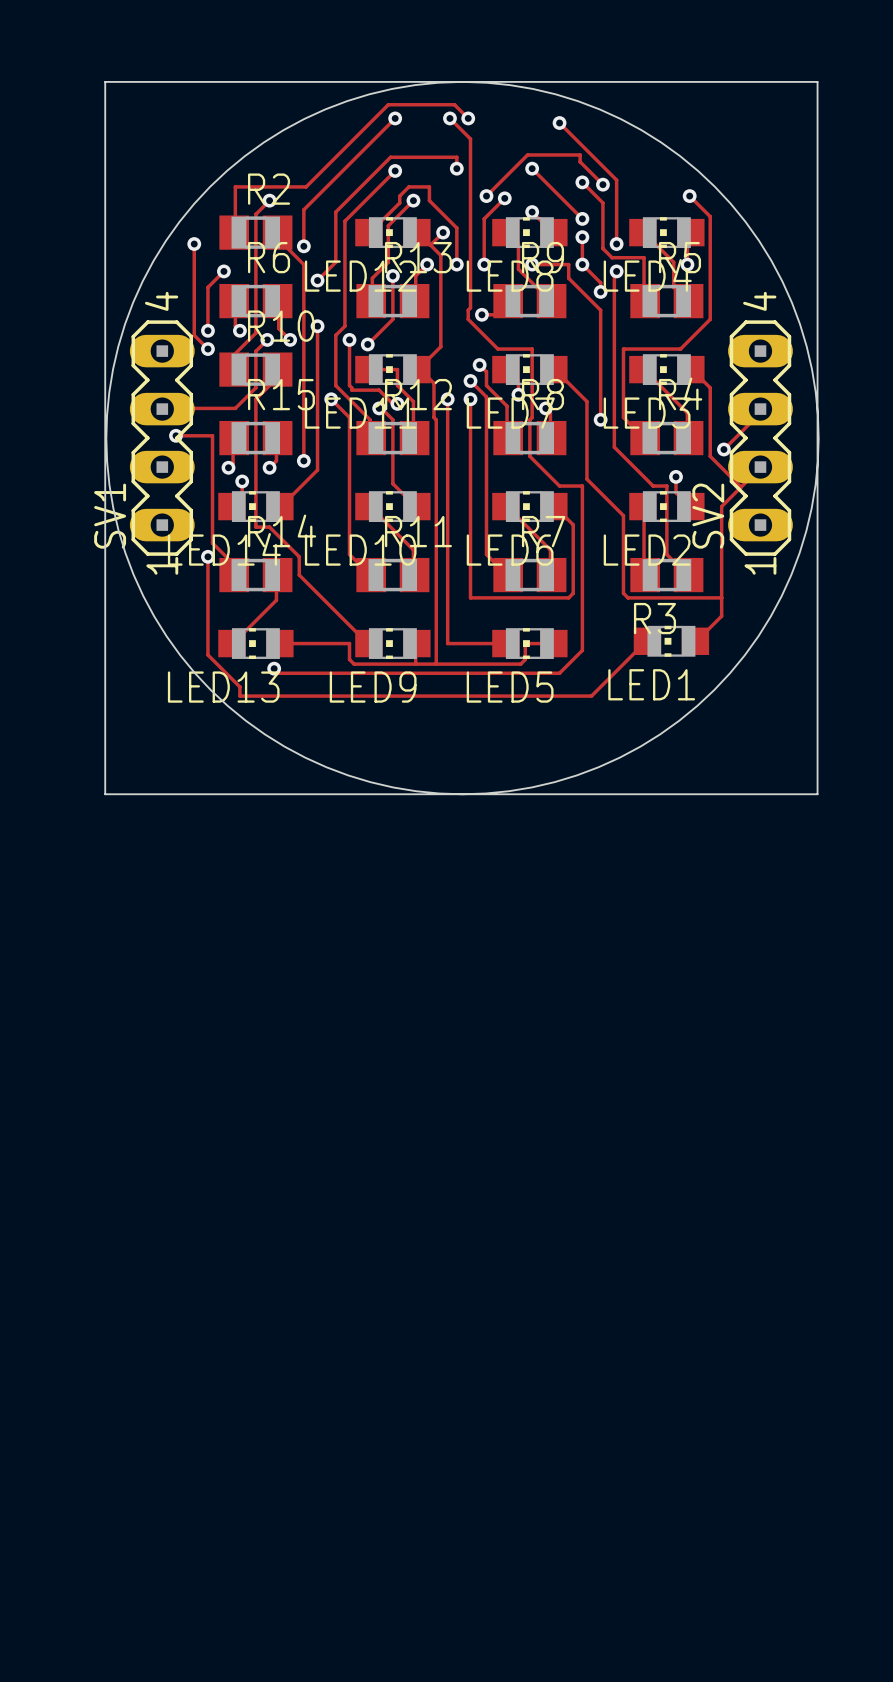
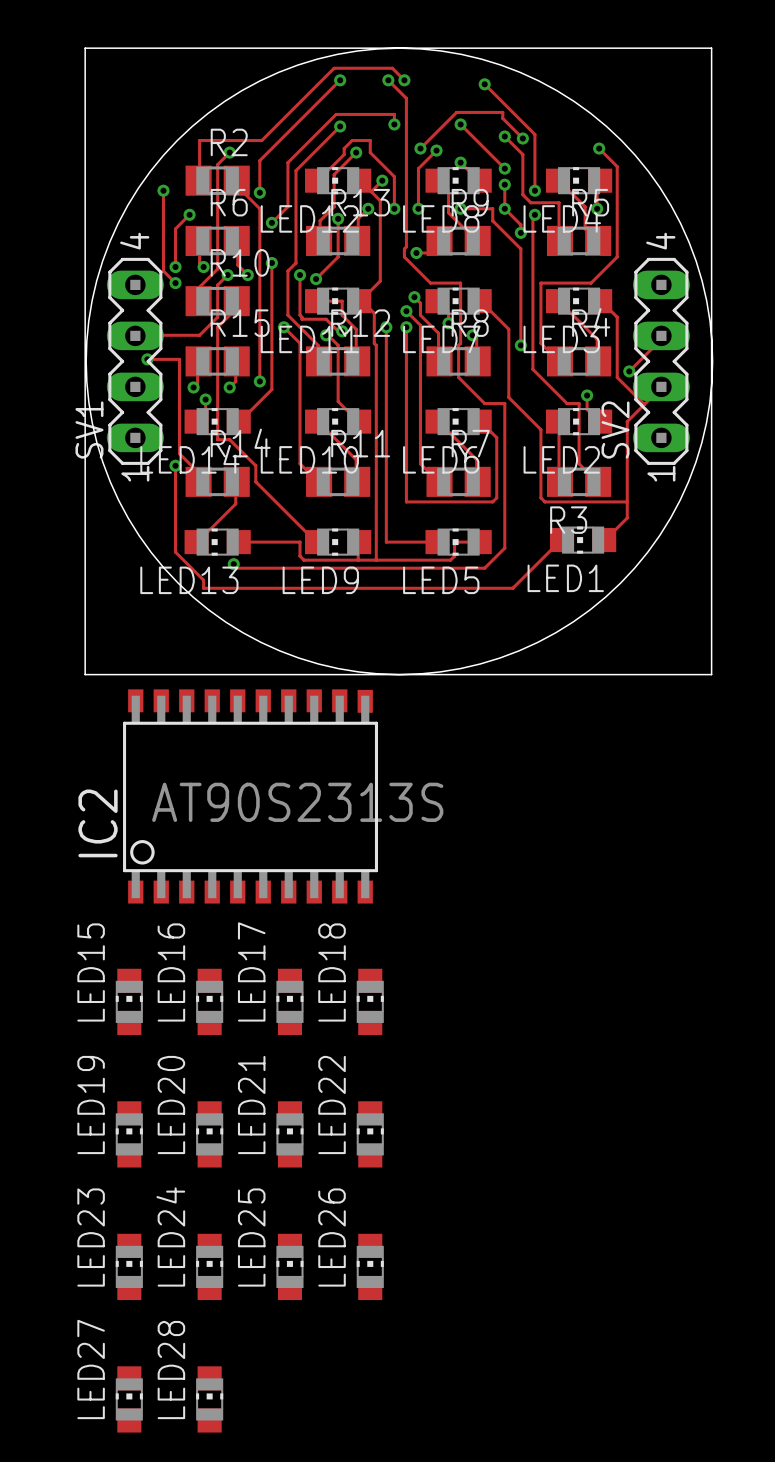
IC2: none -> AT90S2313S (250, 796)
LED15: none -> (129, 1001)
LED16: none -> (209, 1001)
LED17: none -> (289, 1001)
LED18: none -> (370, 1001)
LED19: none -> (129, 1134)
LED20: none -> (209, 1134)
LED21: none -> (289, 1134)
LED22: none -> (370, 1134)
LED23: none -> (129, 1266)
LED24: none -> (209, 1266)
LED25: none -> (289, 1266)
LED26: none -> (370, 1266)
LED27: none -> (129, 1399)
LED28: none -> (209, 1399)

